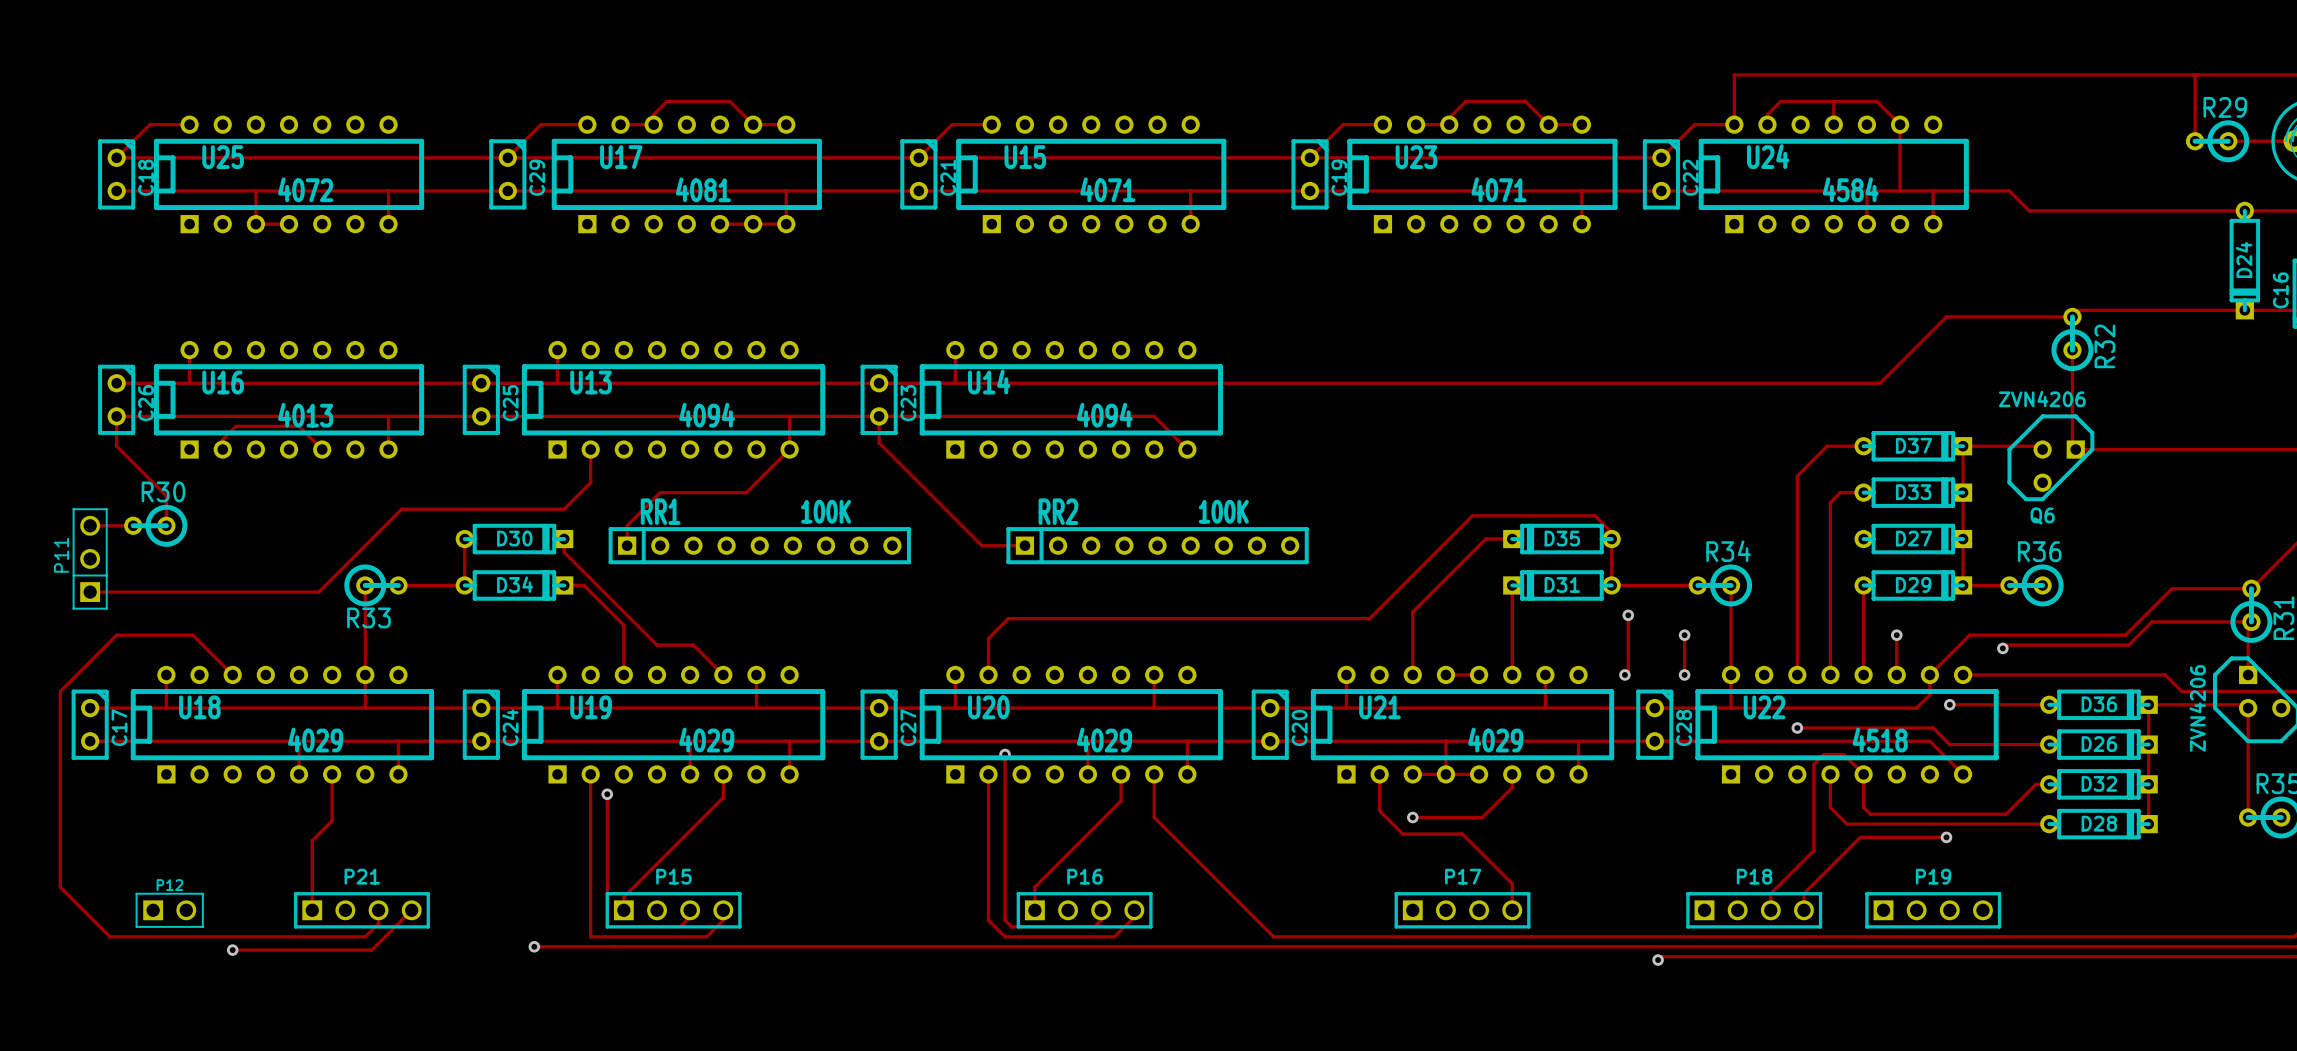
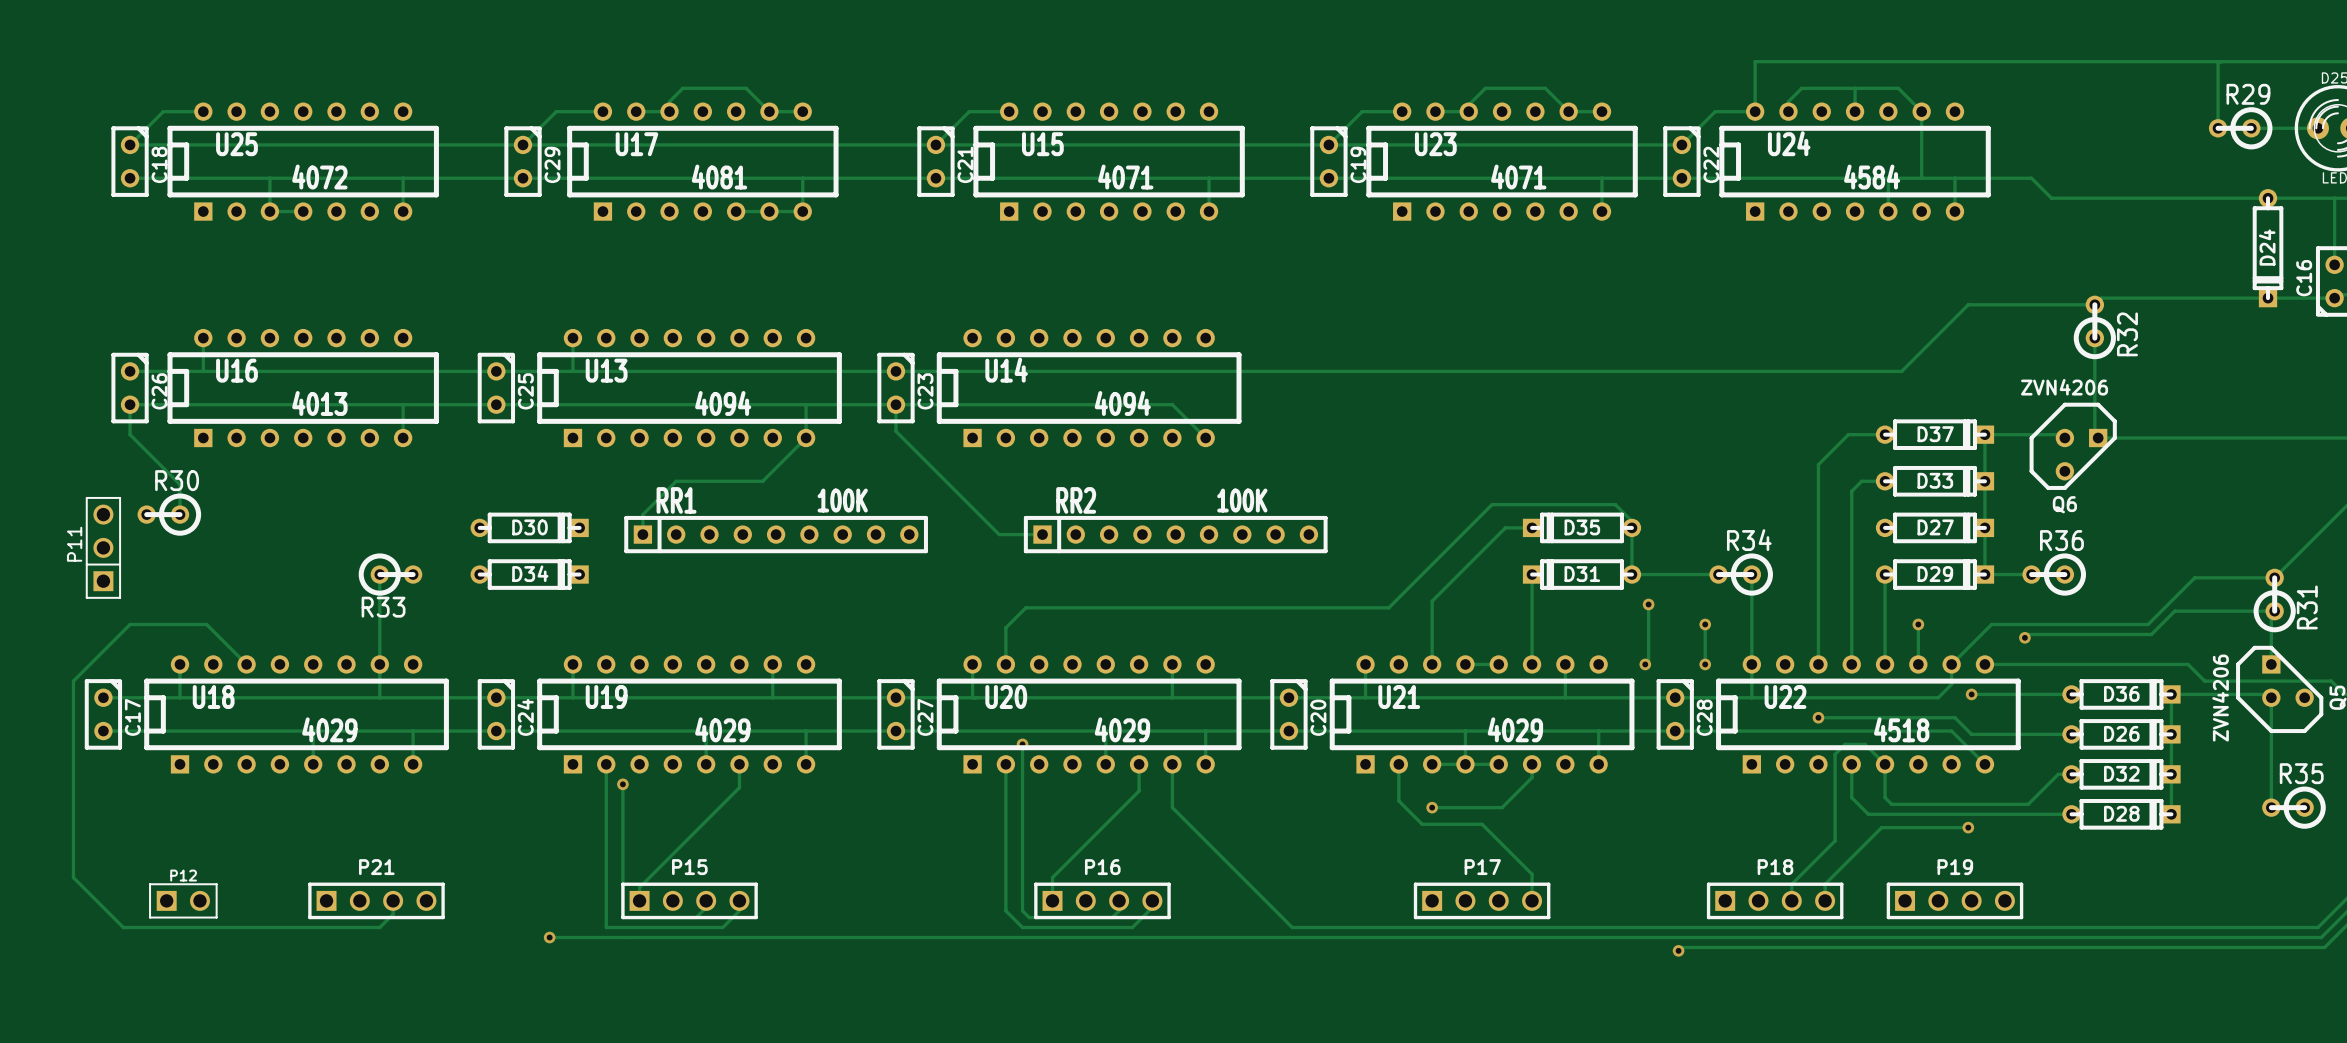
track: (955, 350) (955, 383) -> none
track: (222, 449) (222, 439) (236, 426) (298, 426) (322, 449) -> none
track: (590, 449) (590, 482) (564, 509) (401, 509) (318, 592) (90, 592) -> none
track: (90, 525) (133, 525) -> none
track: (464, 539) (464, 585) (398, 585) -> none
track: (564, 539) (564, 552) (657, 645) (693, 645) (723, 674) -> none
track: (564, 585) (584, 585) (623, 625) (623, 674) -> none
track: (332, 774) (332, 820) (312, 840) (312, 910) -> none
track: (411, 910) (371, 950) (232, 950) -> none
via: (232, 950) -> none

